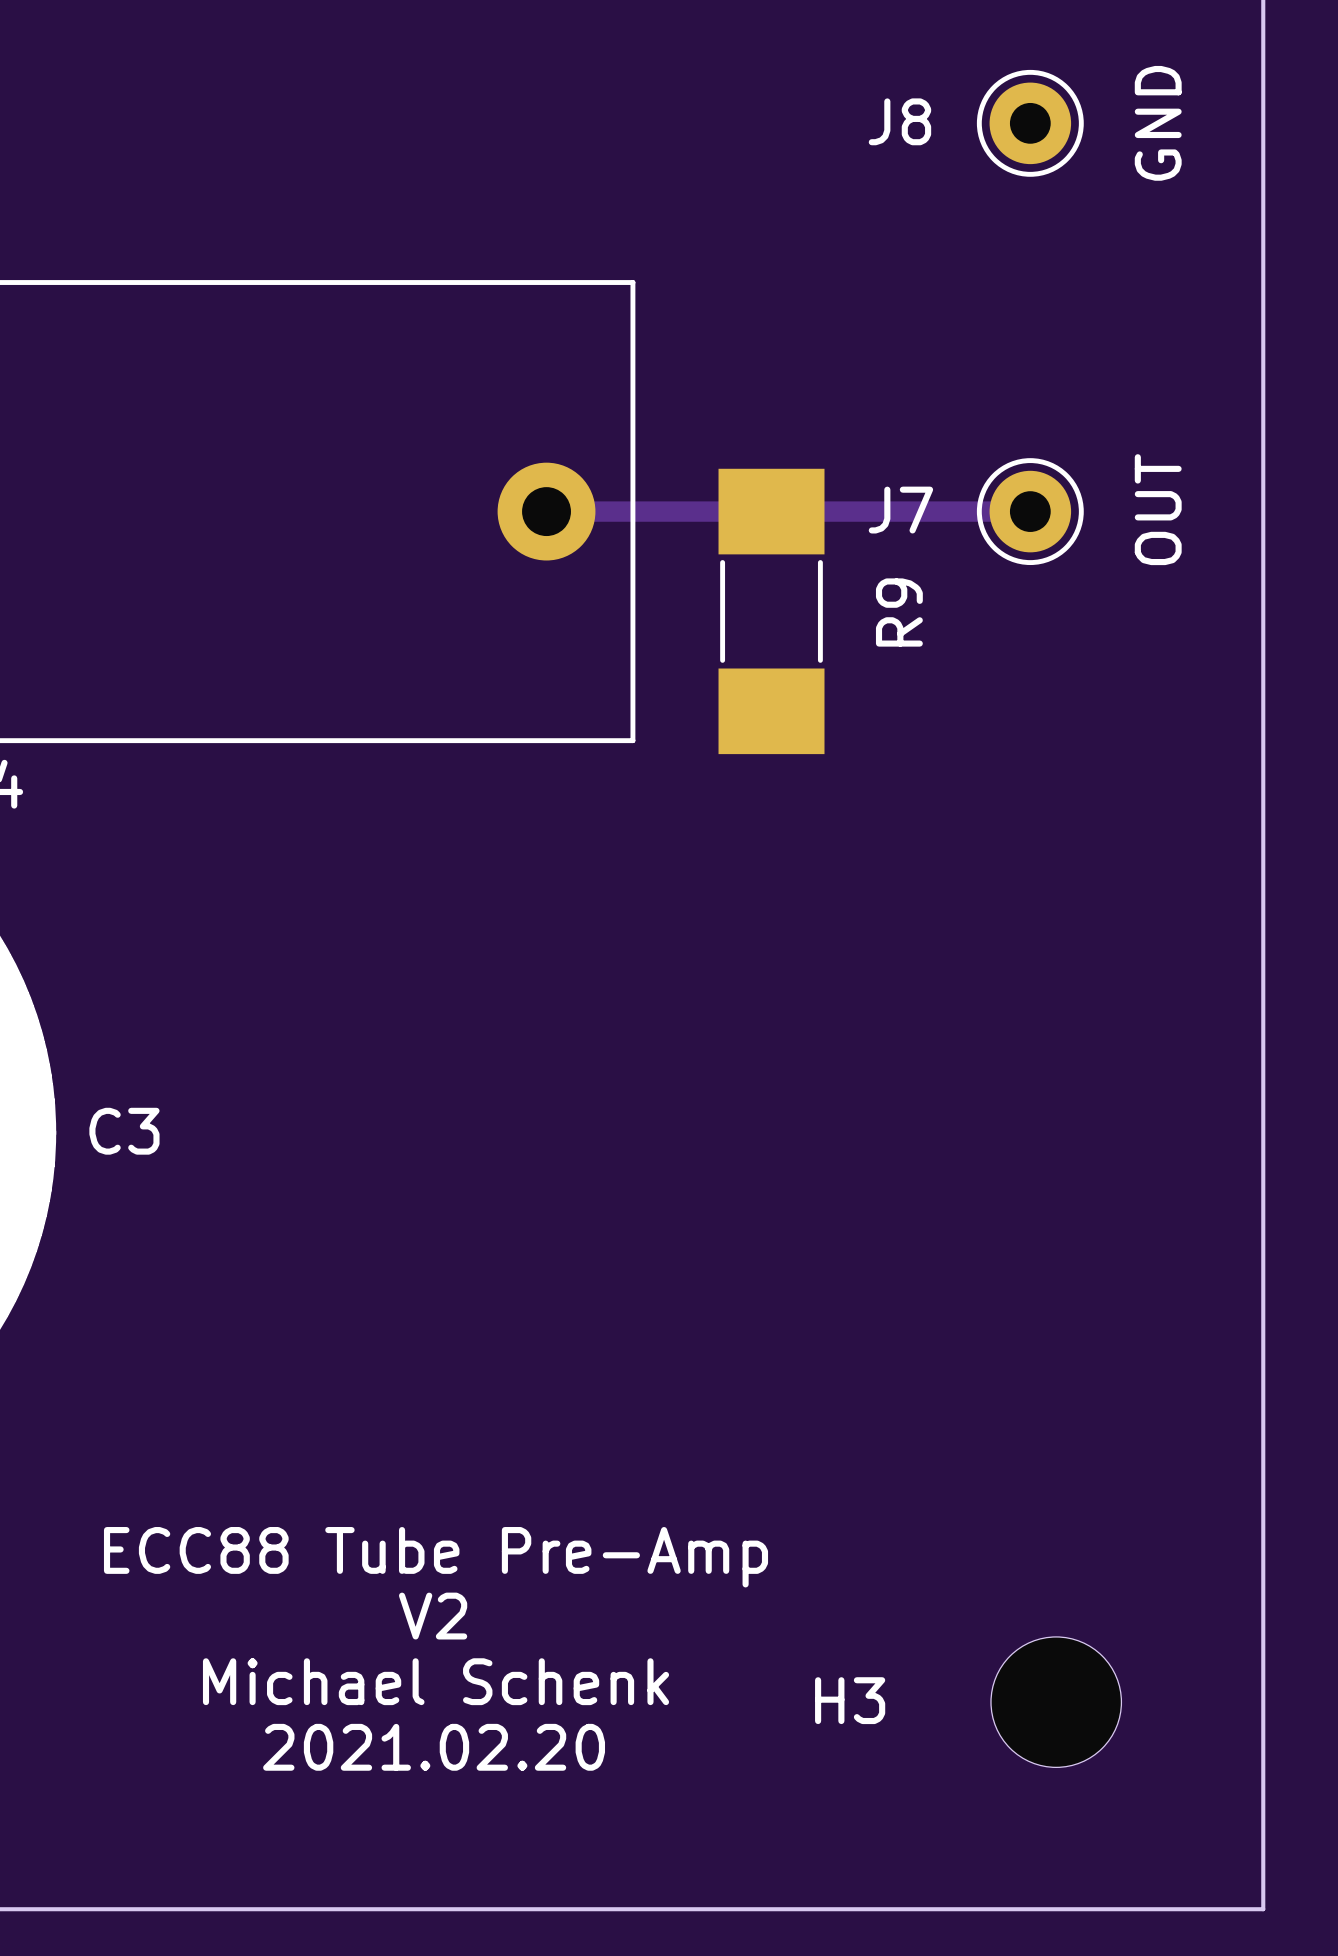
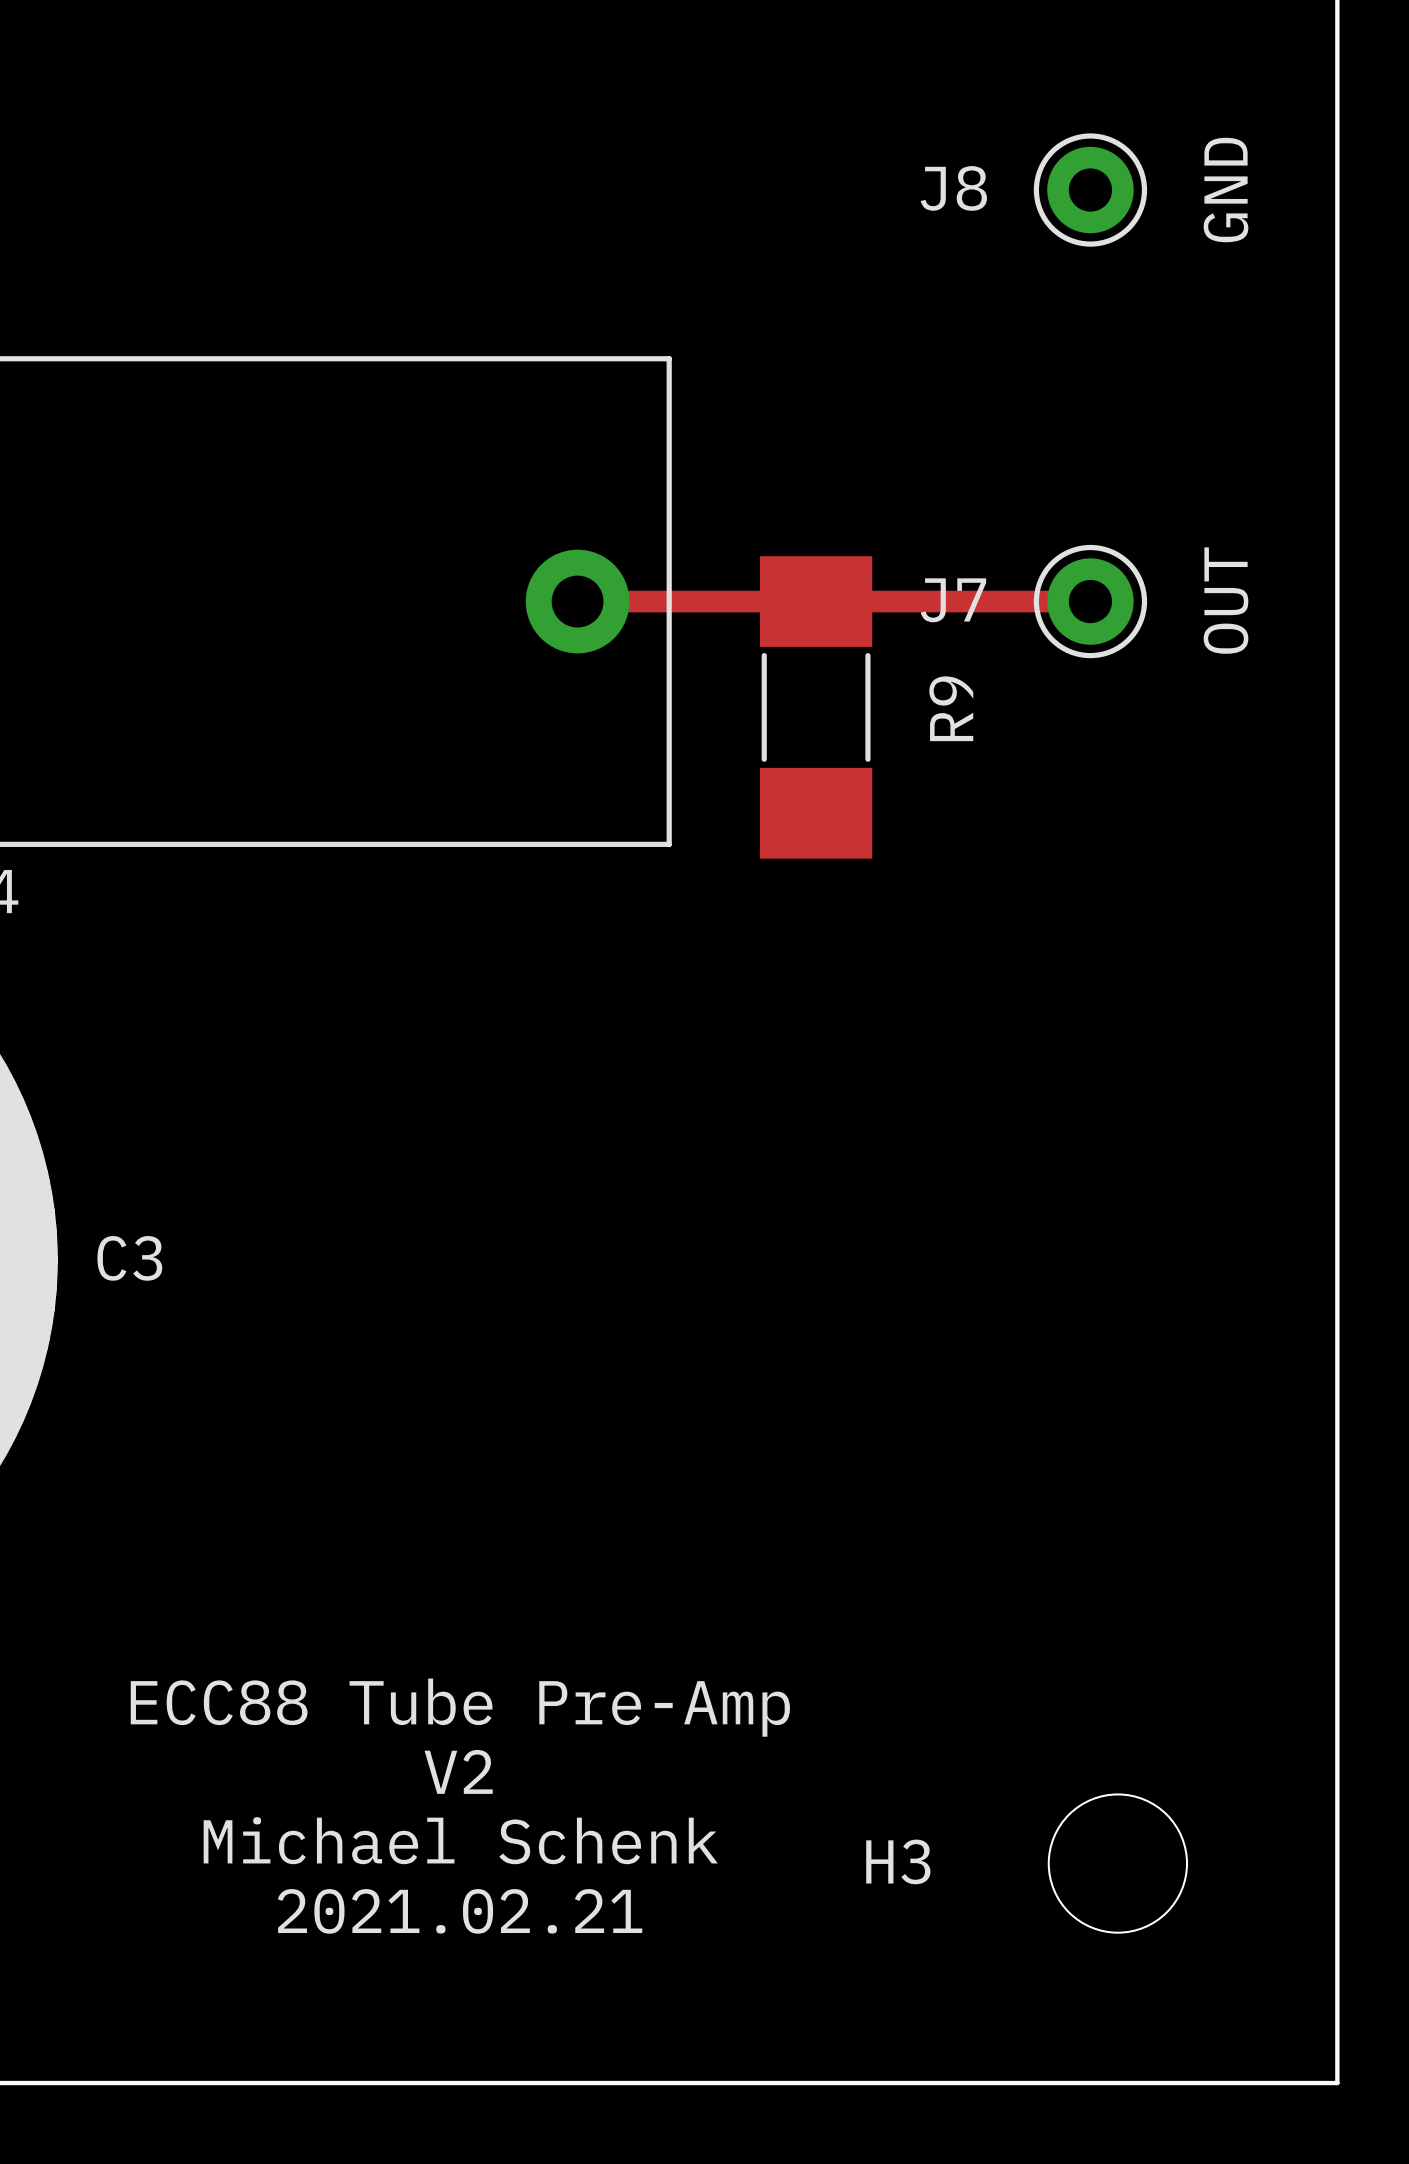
text: 2021.02.20 (434, 1747) -> 2021.02.21 (460, 1911)

